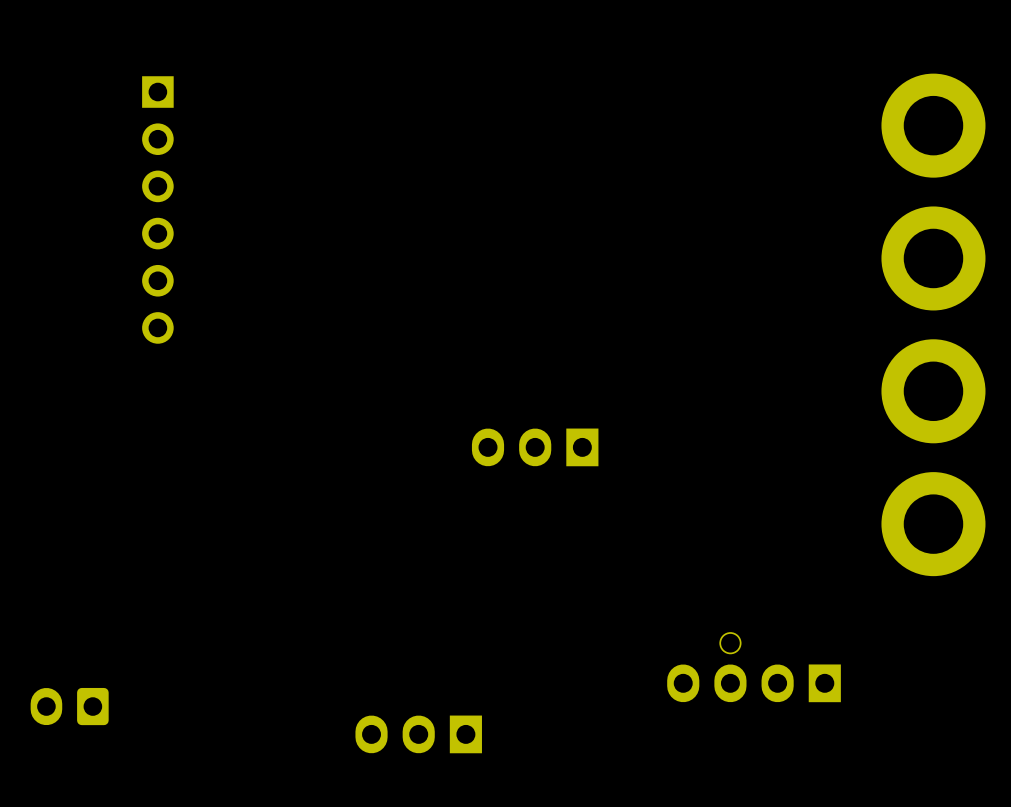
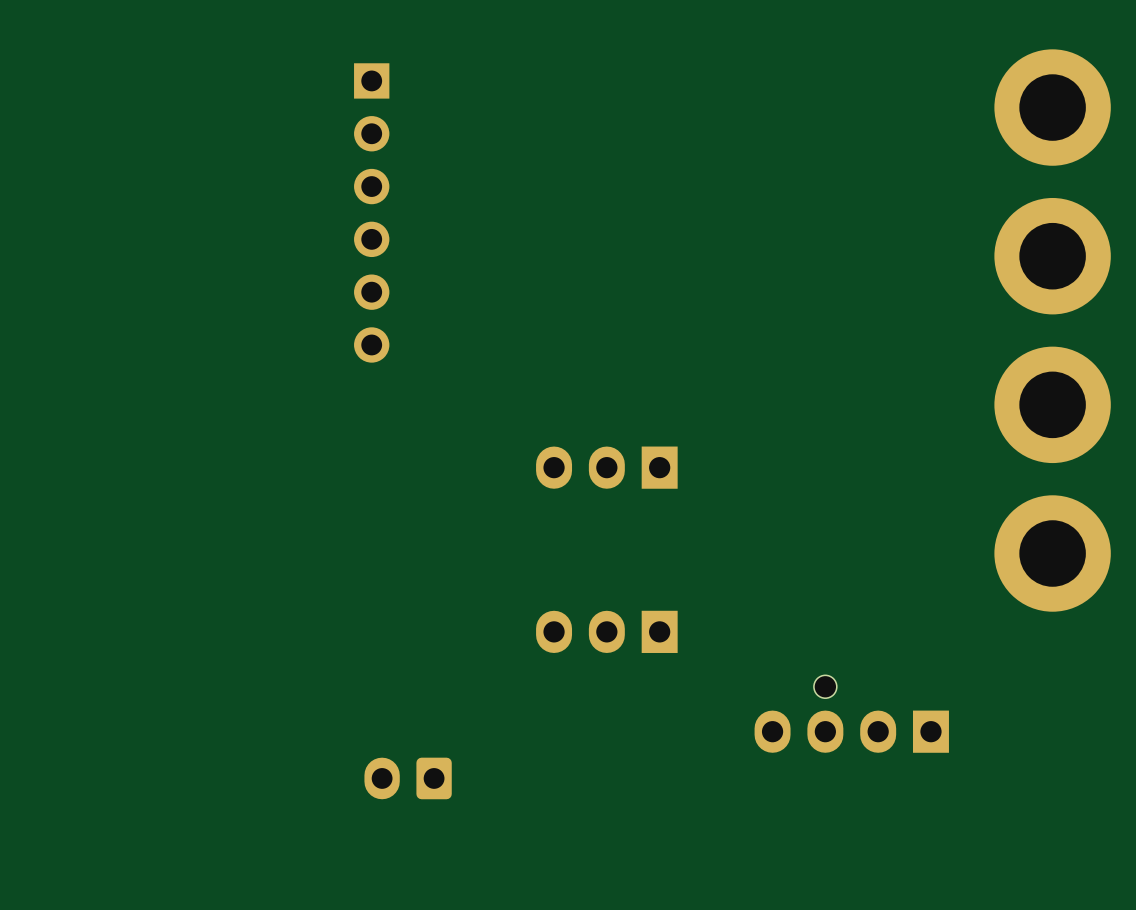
part position: (157, 209) -> (371, 212)
part position: (69, 706) -> (408, 778)
part position: (418, 734) -> (606, 631)

